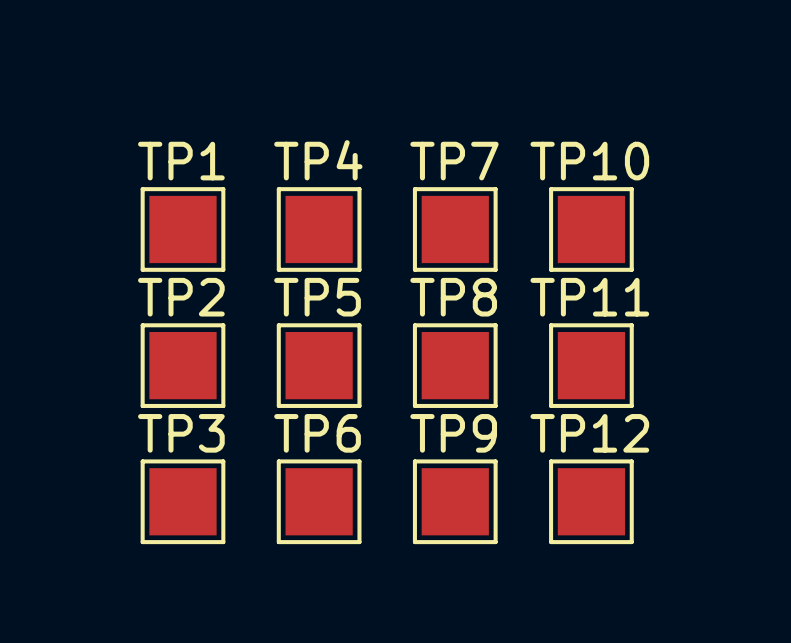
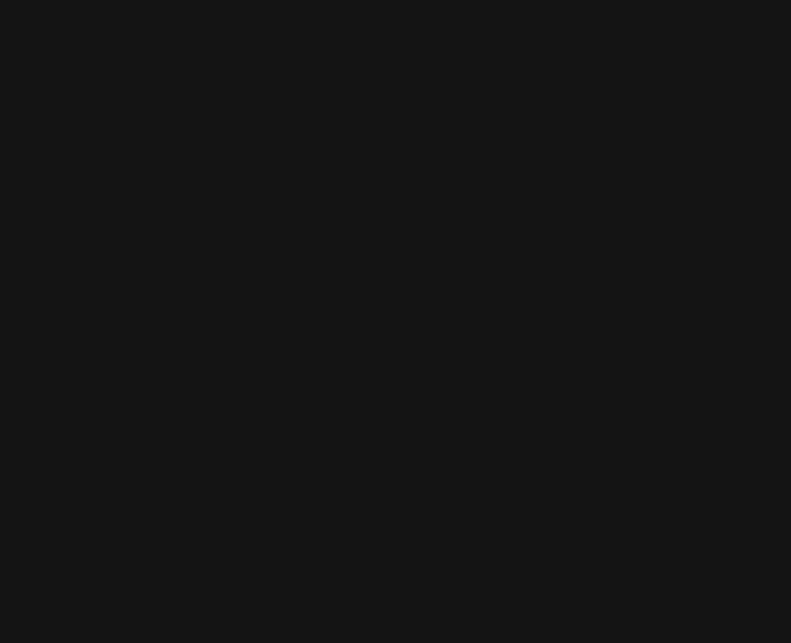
TP1: (182, 229) -> none
TP4: (319, 229) -> none
TP7: (455, 229) -> none
TP10: (591, 229) -> none
TP2: (182, 365) -> none
TP5: (319, 365) -> none
TP8: (455, 365) -> none
TP11: (591, 365) -> none
TP3: (182, 501) -> none
TP6: (319, 501) -> none
TP9: (455, 501) -> none
TP12: (591, 501) -> none

